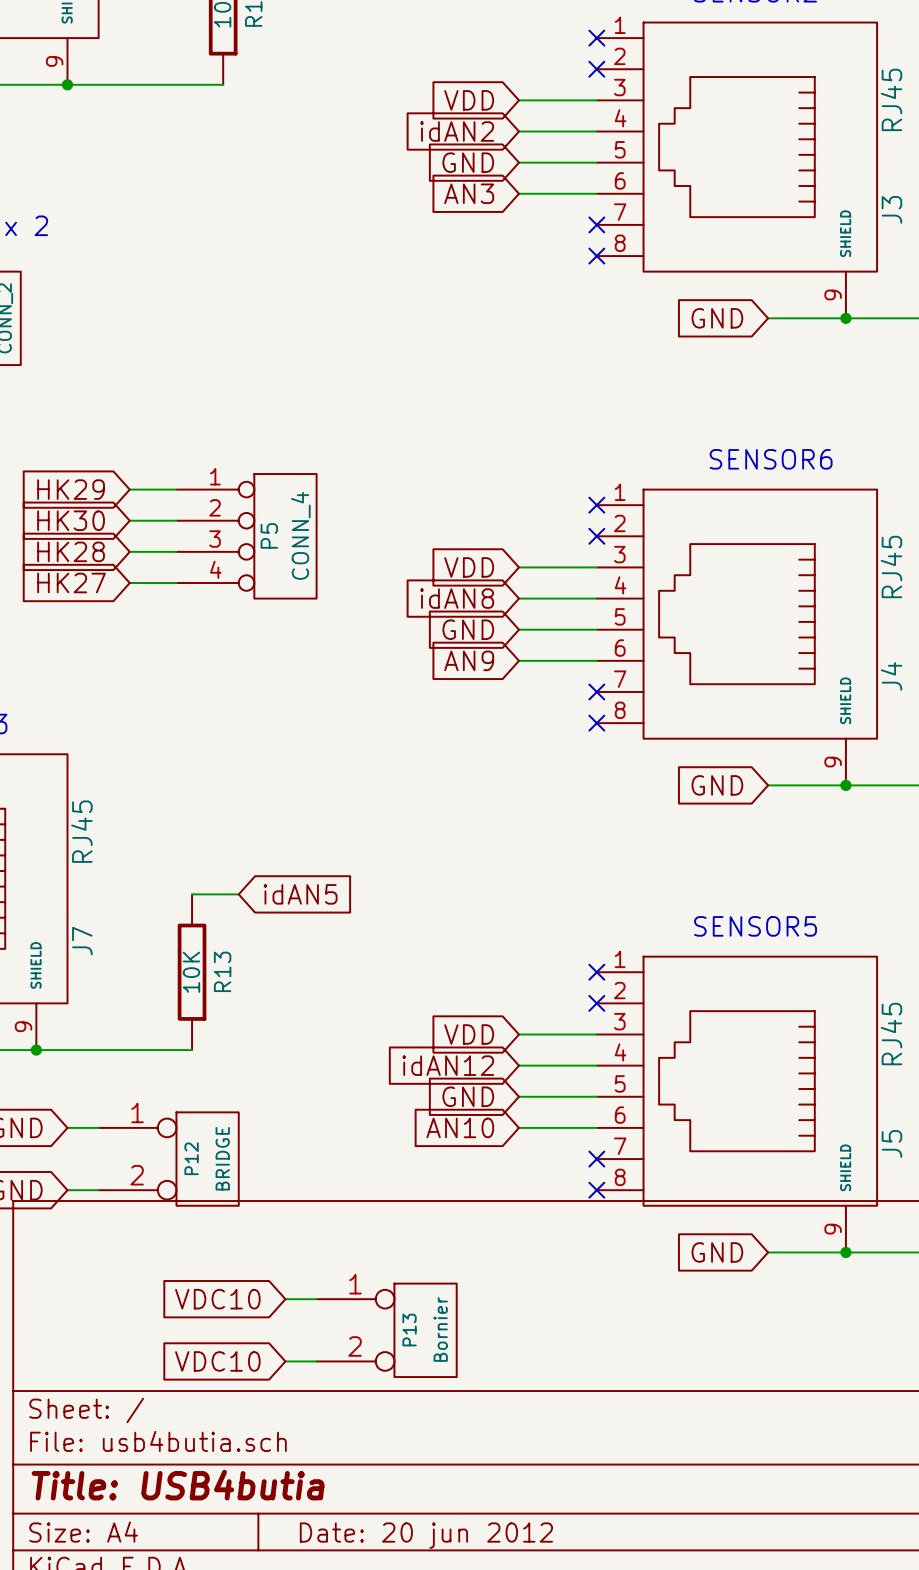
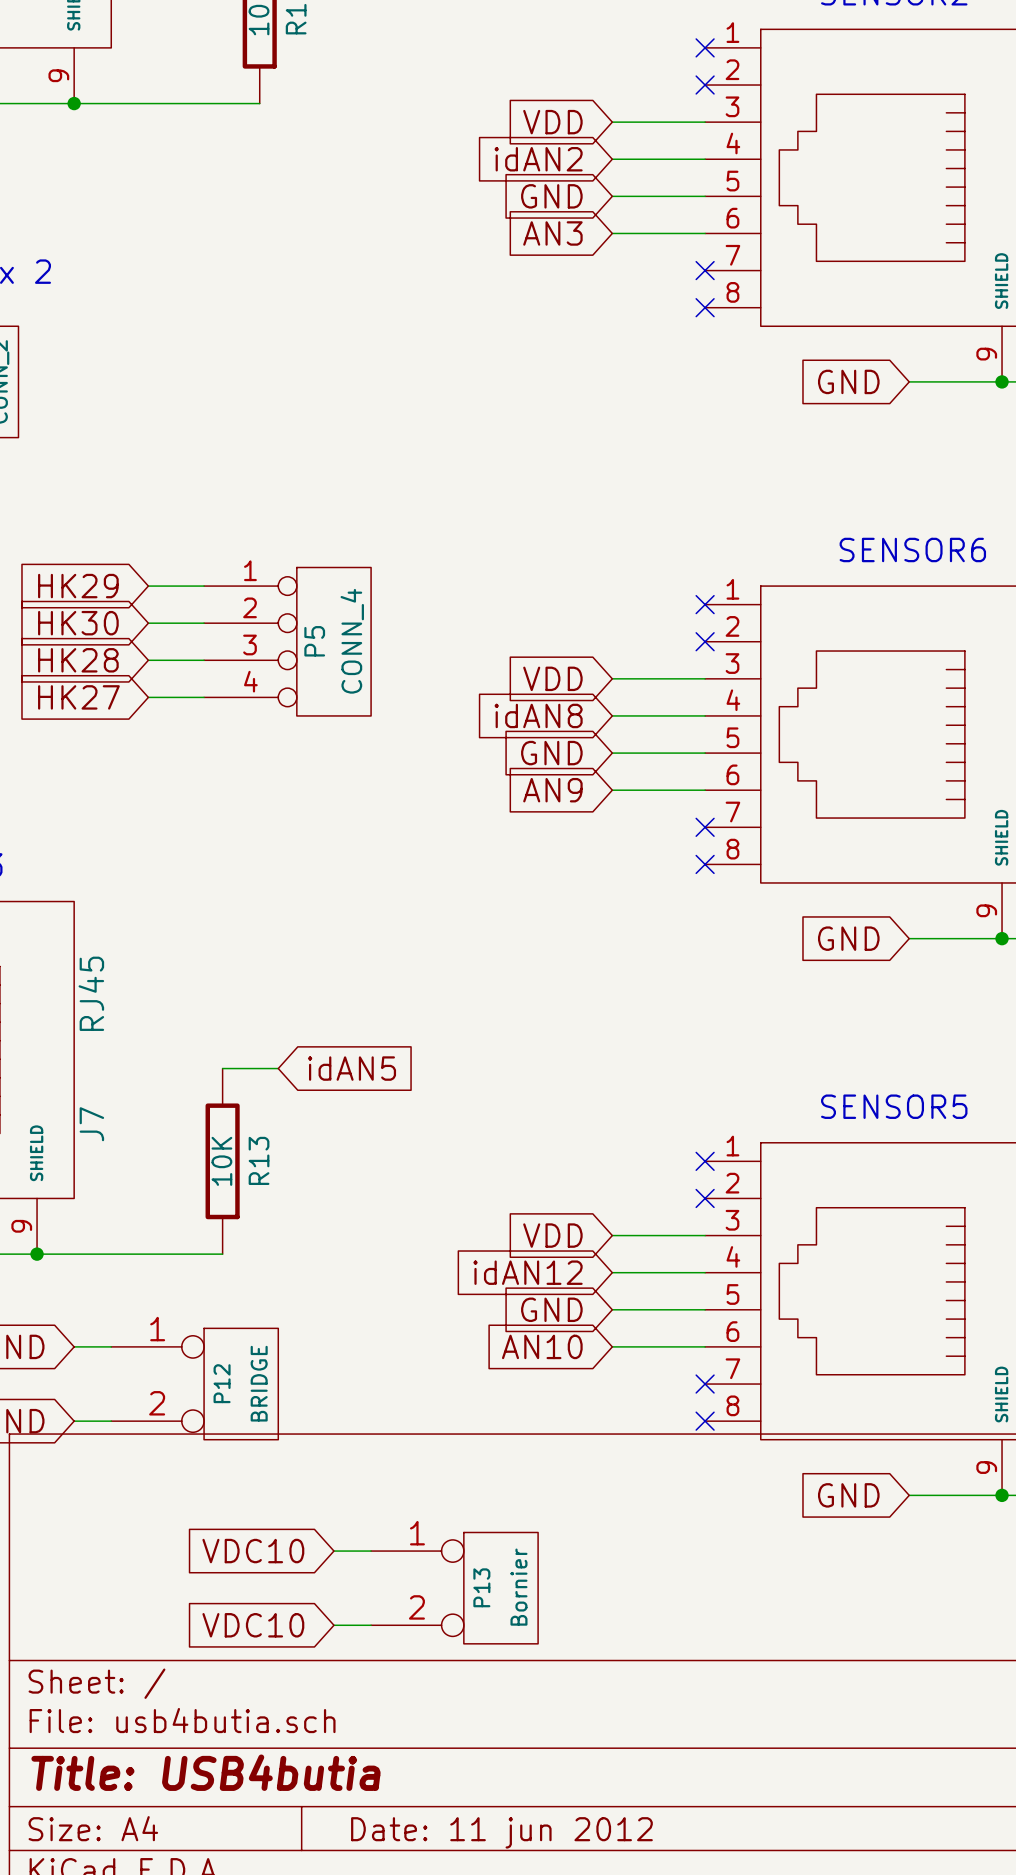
title block: Date: 20 jun 2012 (426, 1535) -> Date: 11 jun 2012 (501, 1832)

